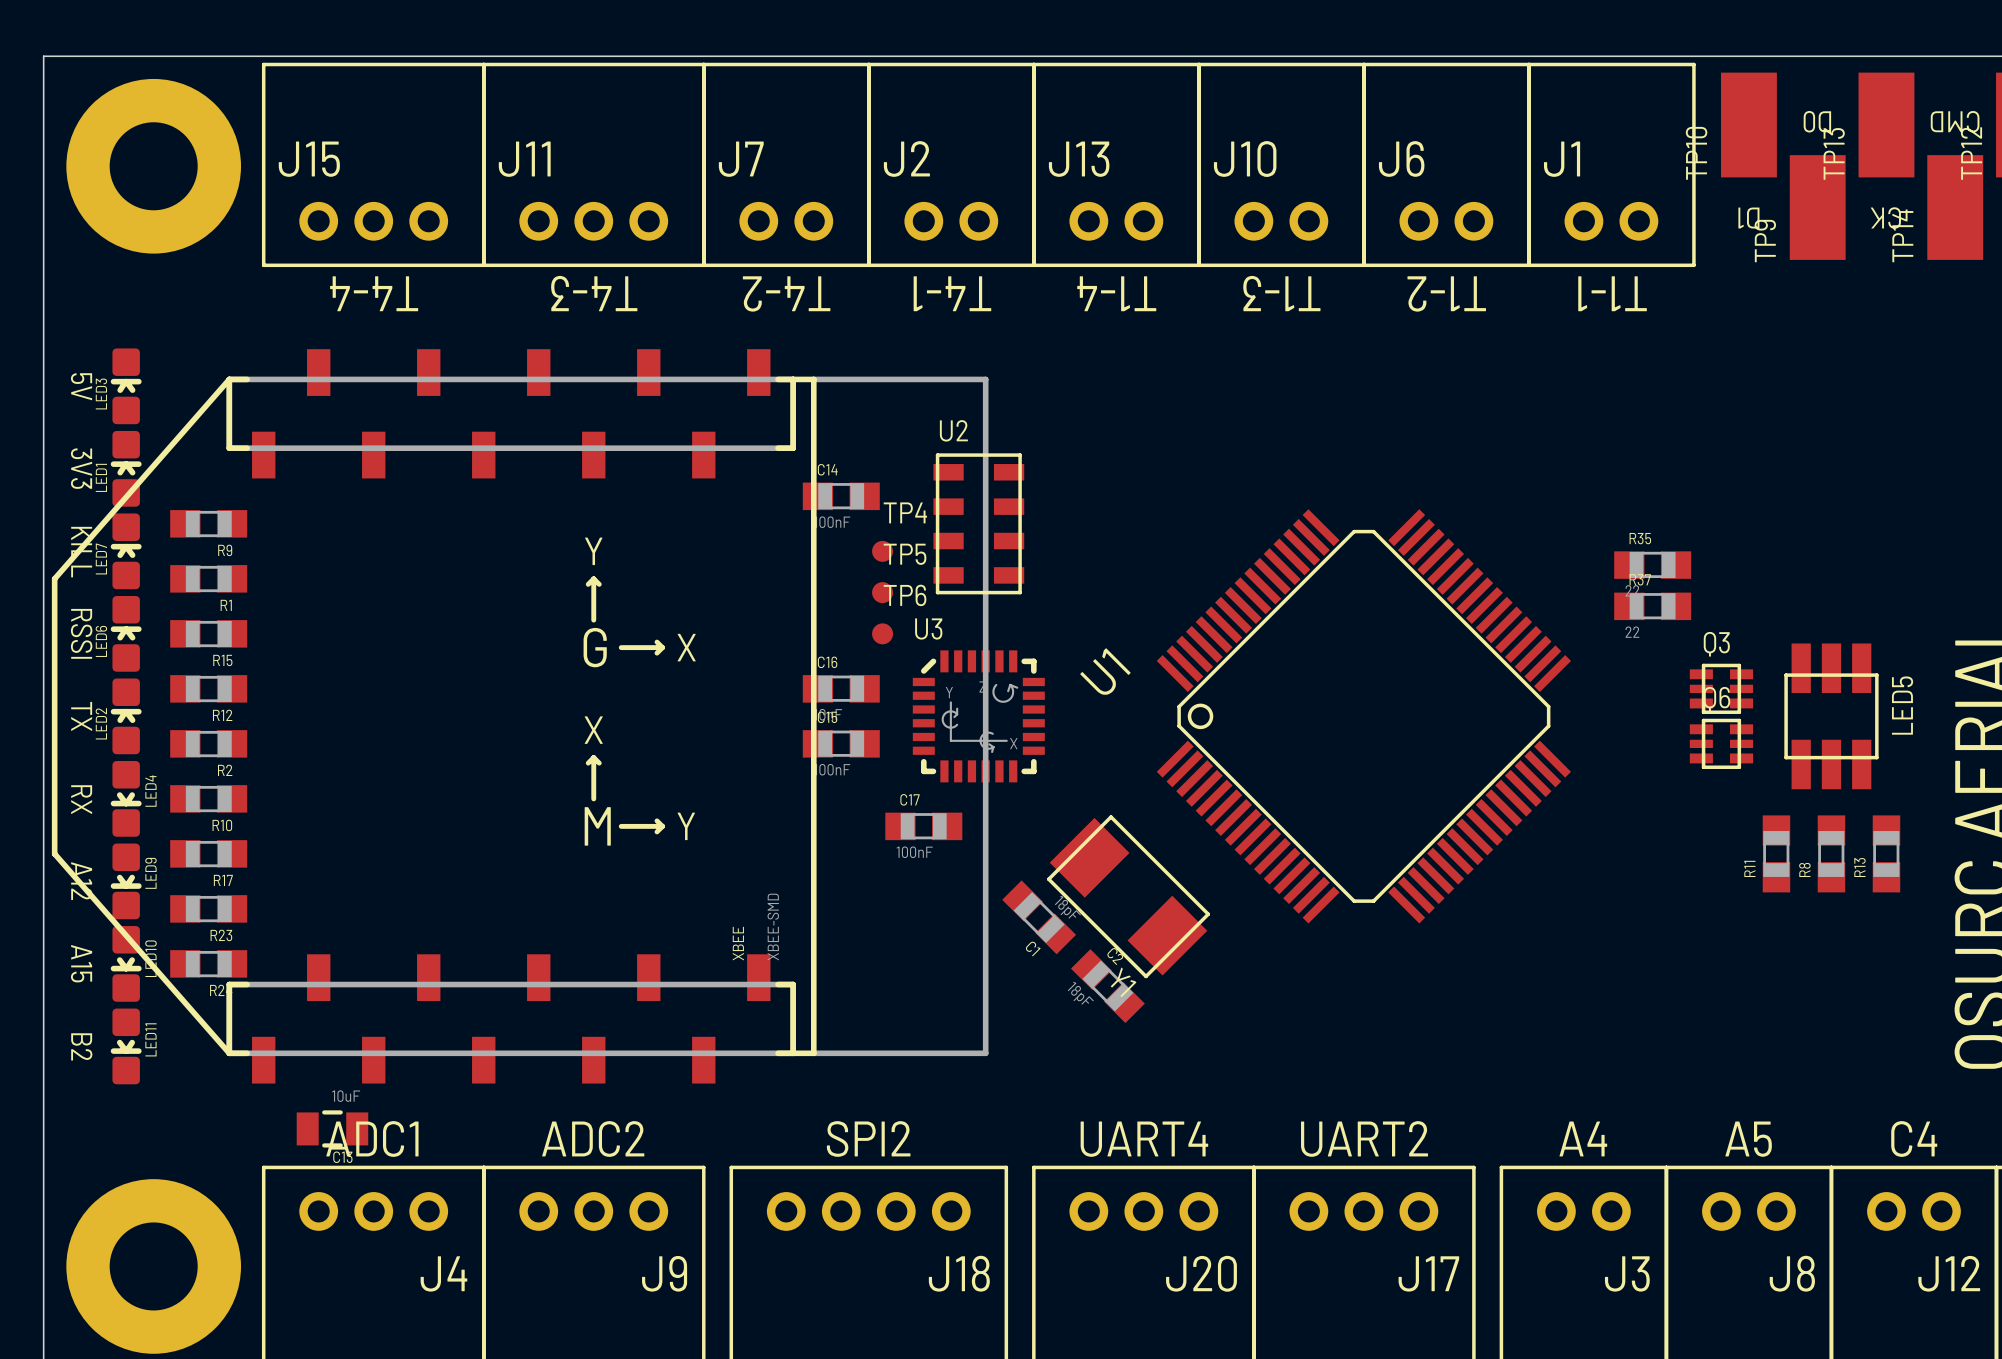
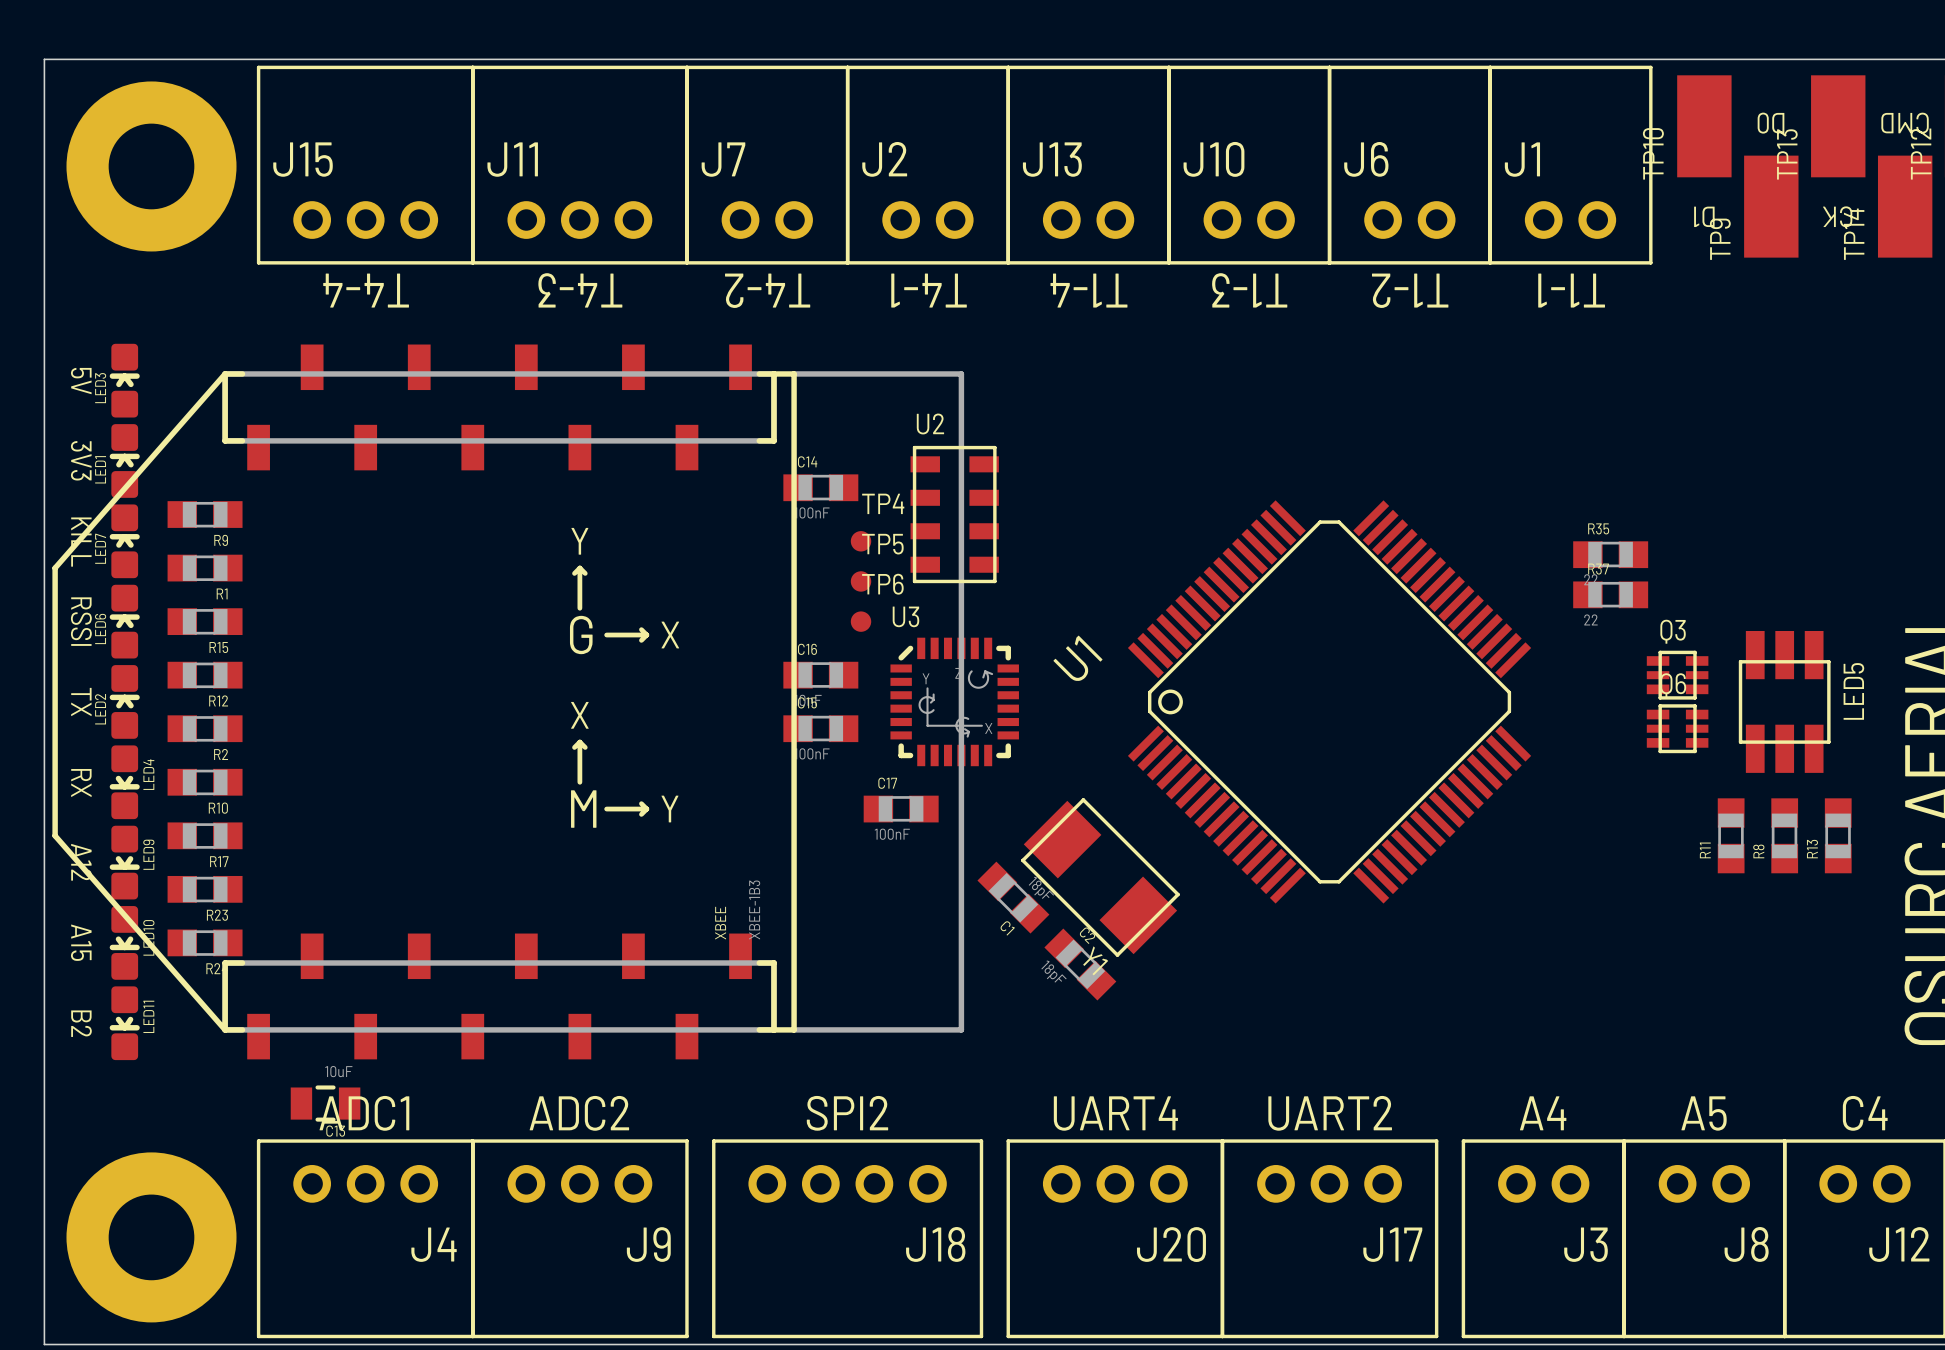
XBEE value: XBEE-SMD (773, 927) -> XBEE-1B3 (754, 909)

